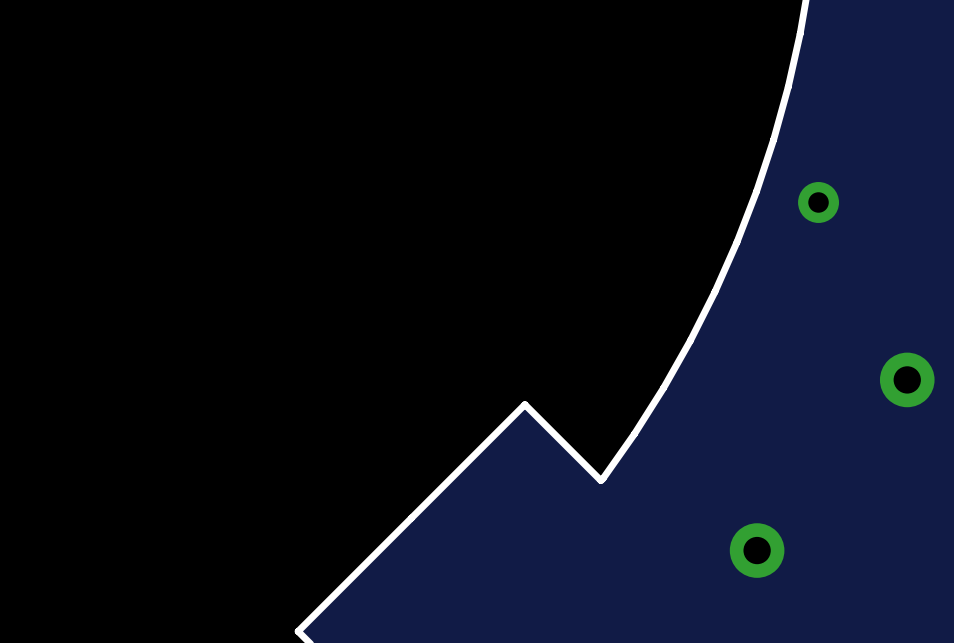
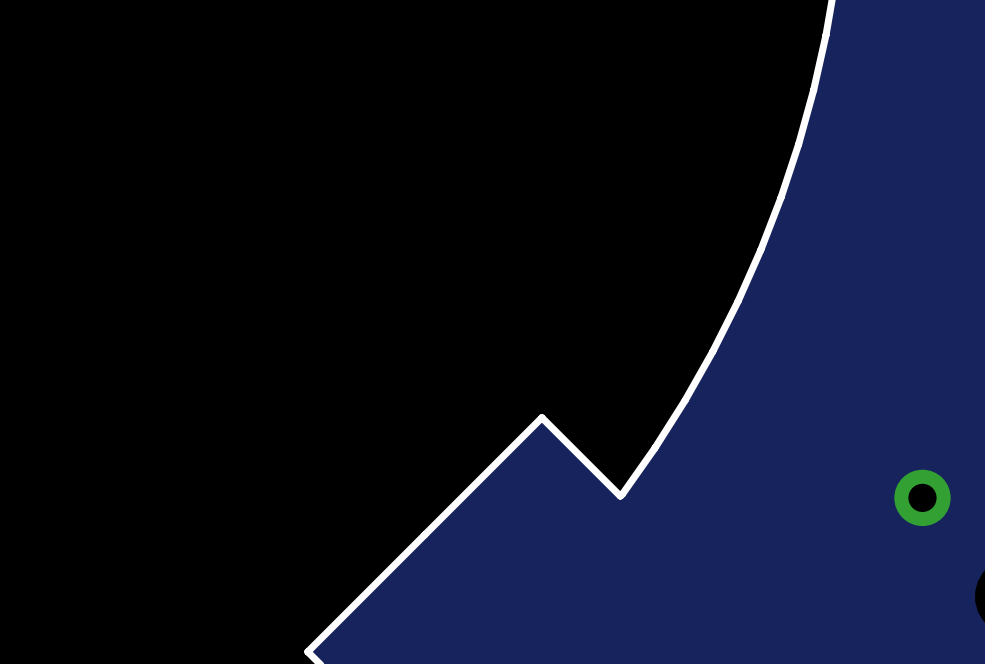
via: (818, 202) -> none
via: (907, 379) -> none
via: none -> (922, 497)
via: (757, 550) -> none

